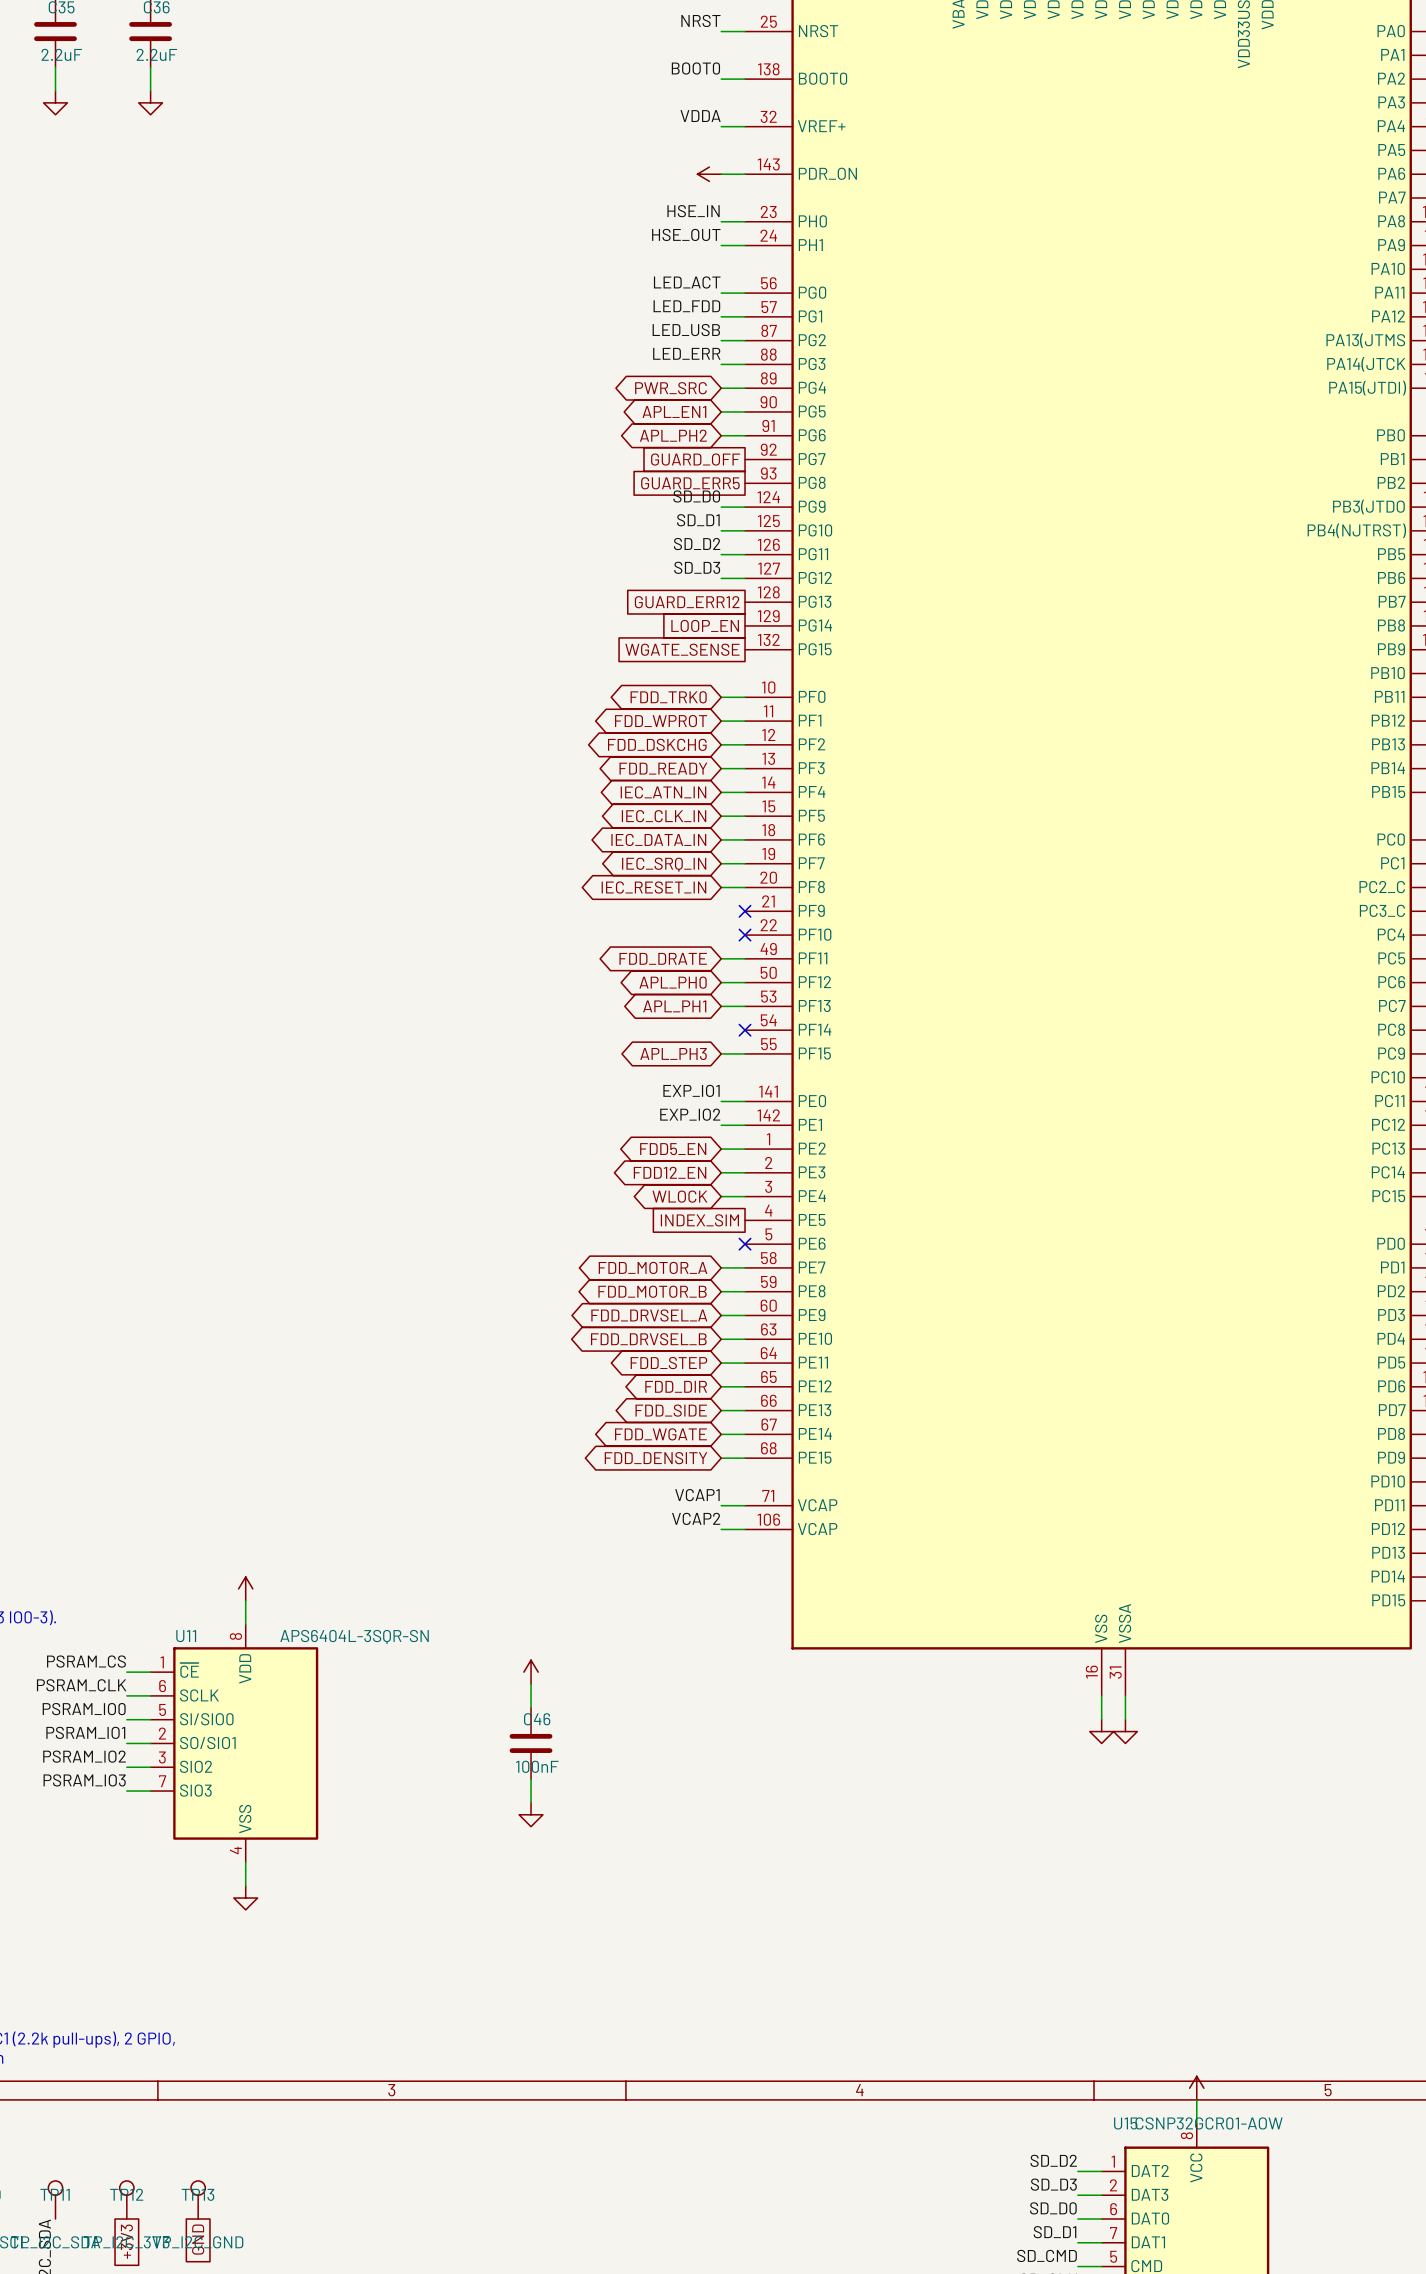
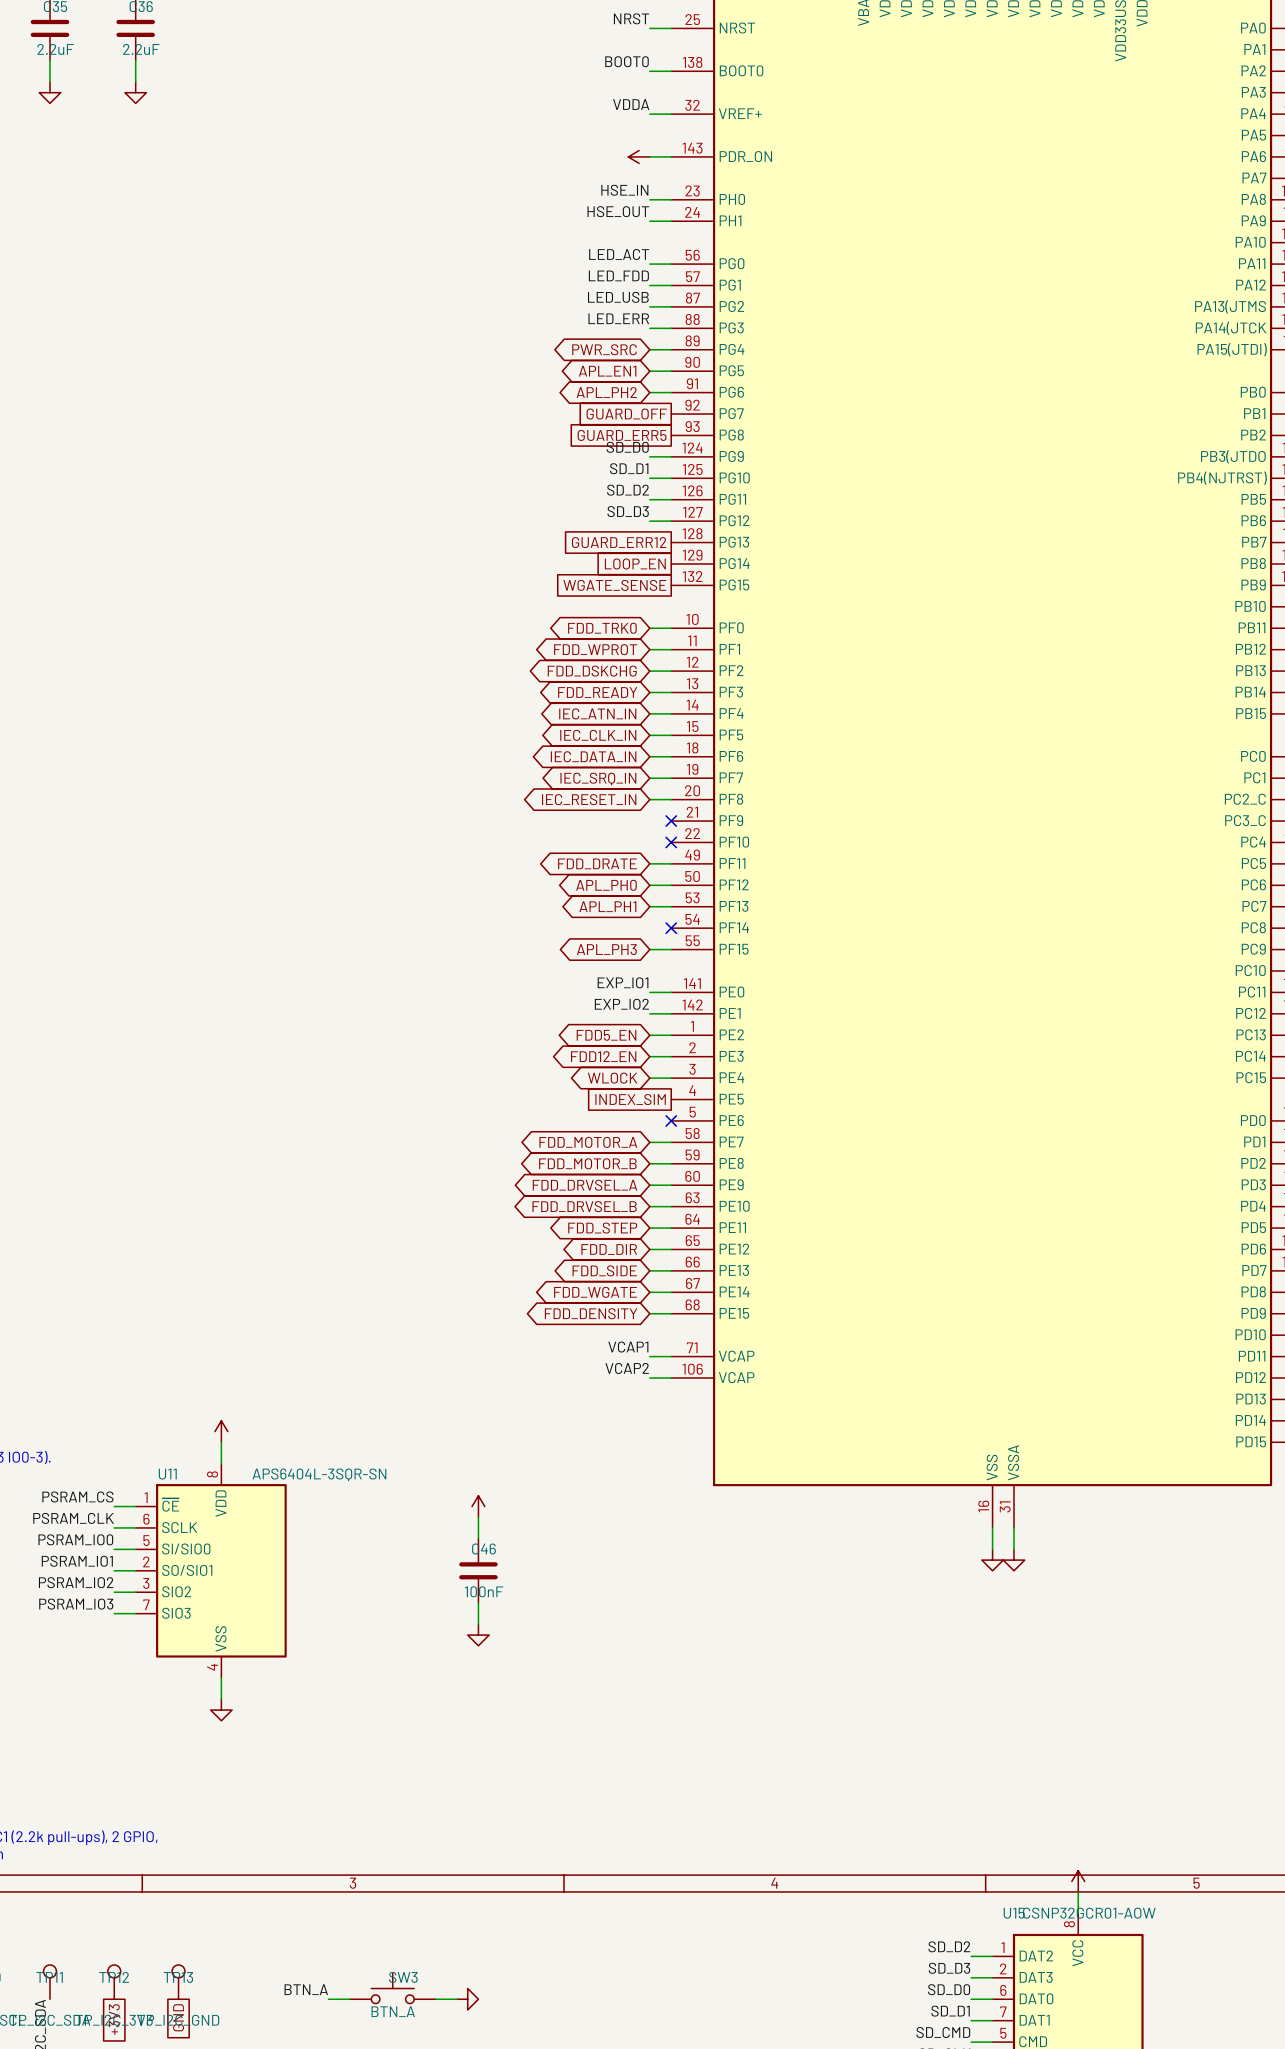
SW3: none -> BTN_A (392, 1988)
label: none -> BTN_A (306, 1989)
wire: none -> (328, 1999) (349, 1999)
wire: none -> (435, 1999) (457, 1999)
power symbol: none -> (467, 1999)

